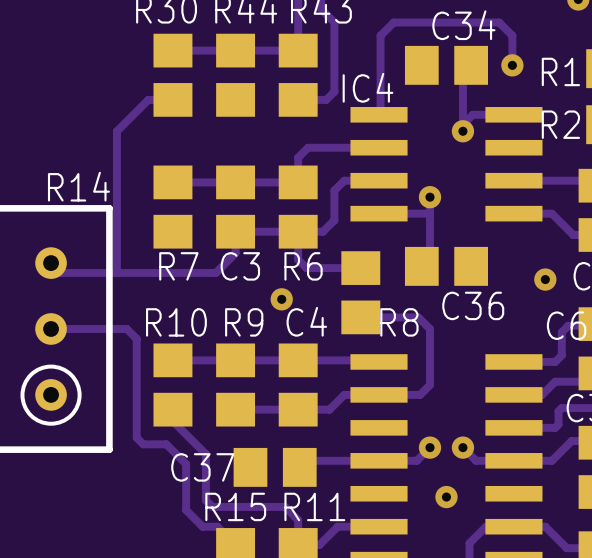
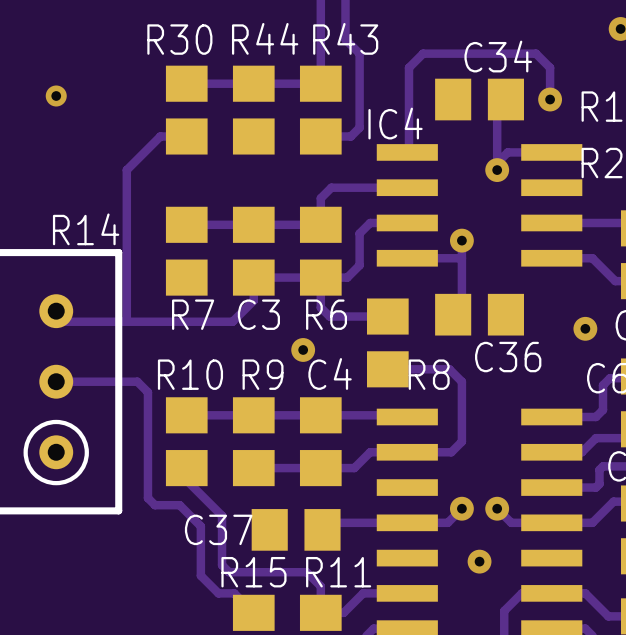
via: none -> (56, 95)

